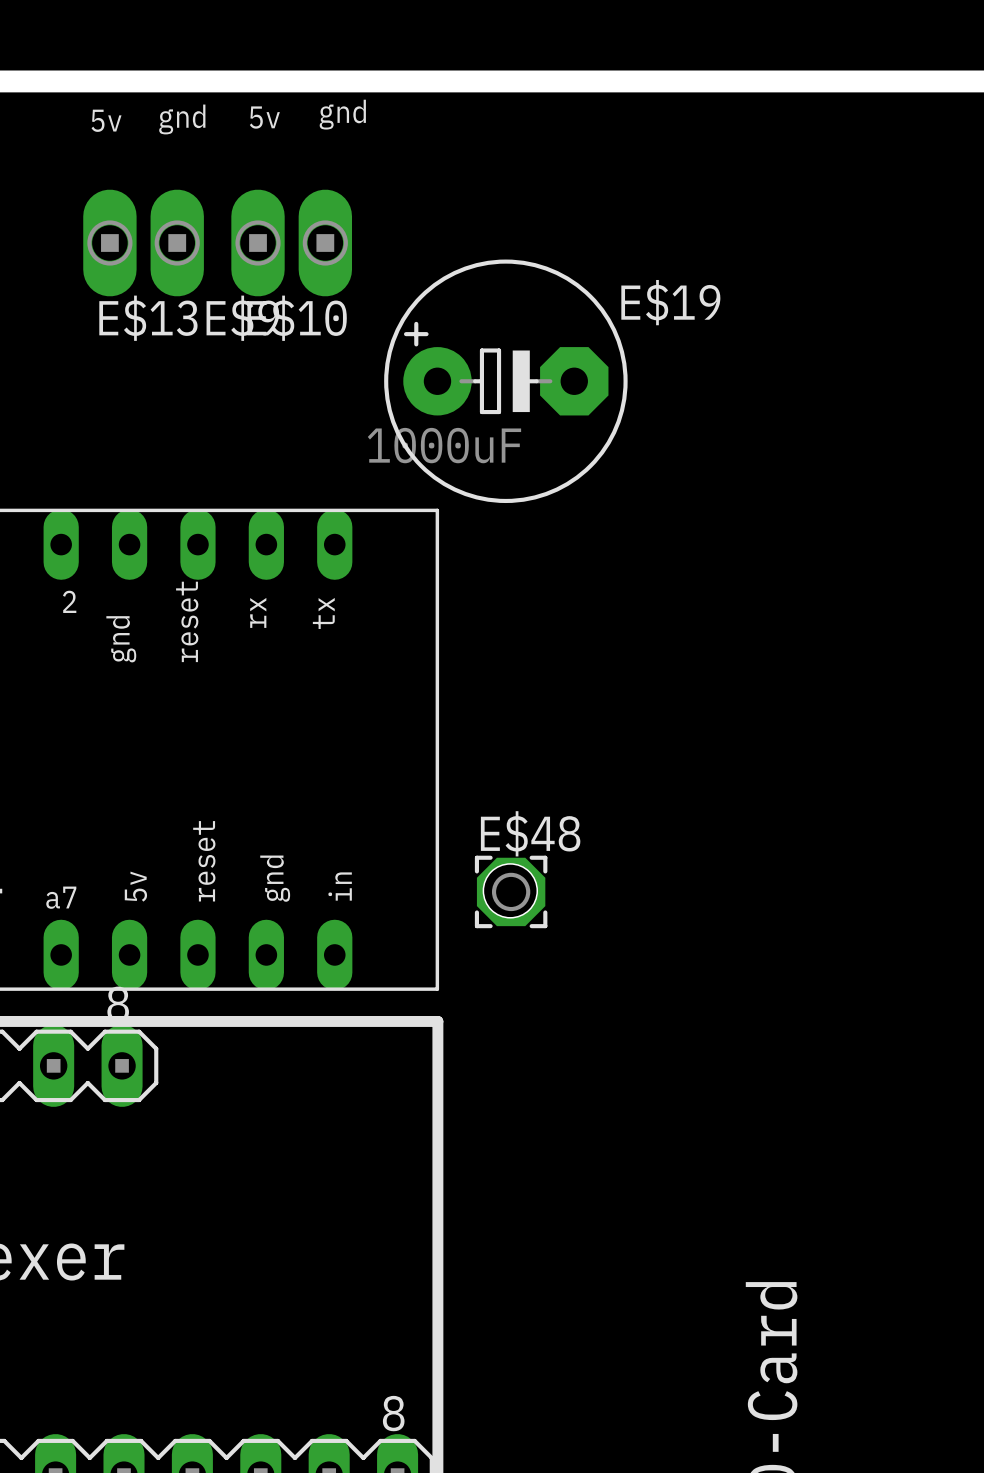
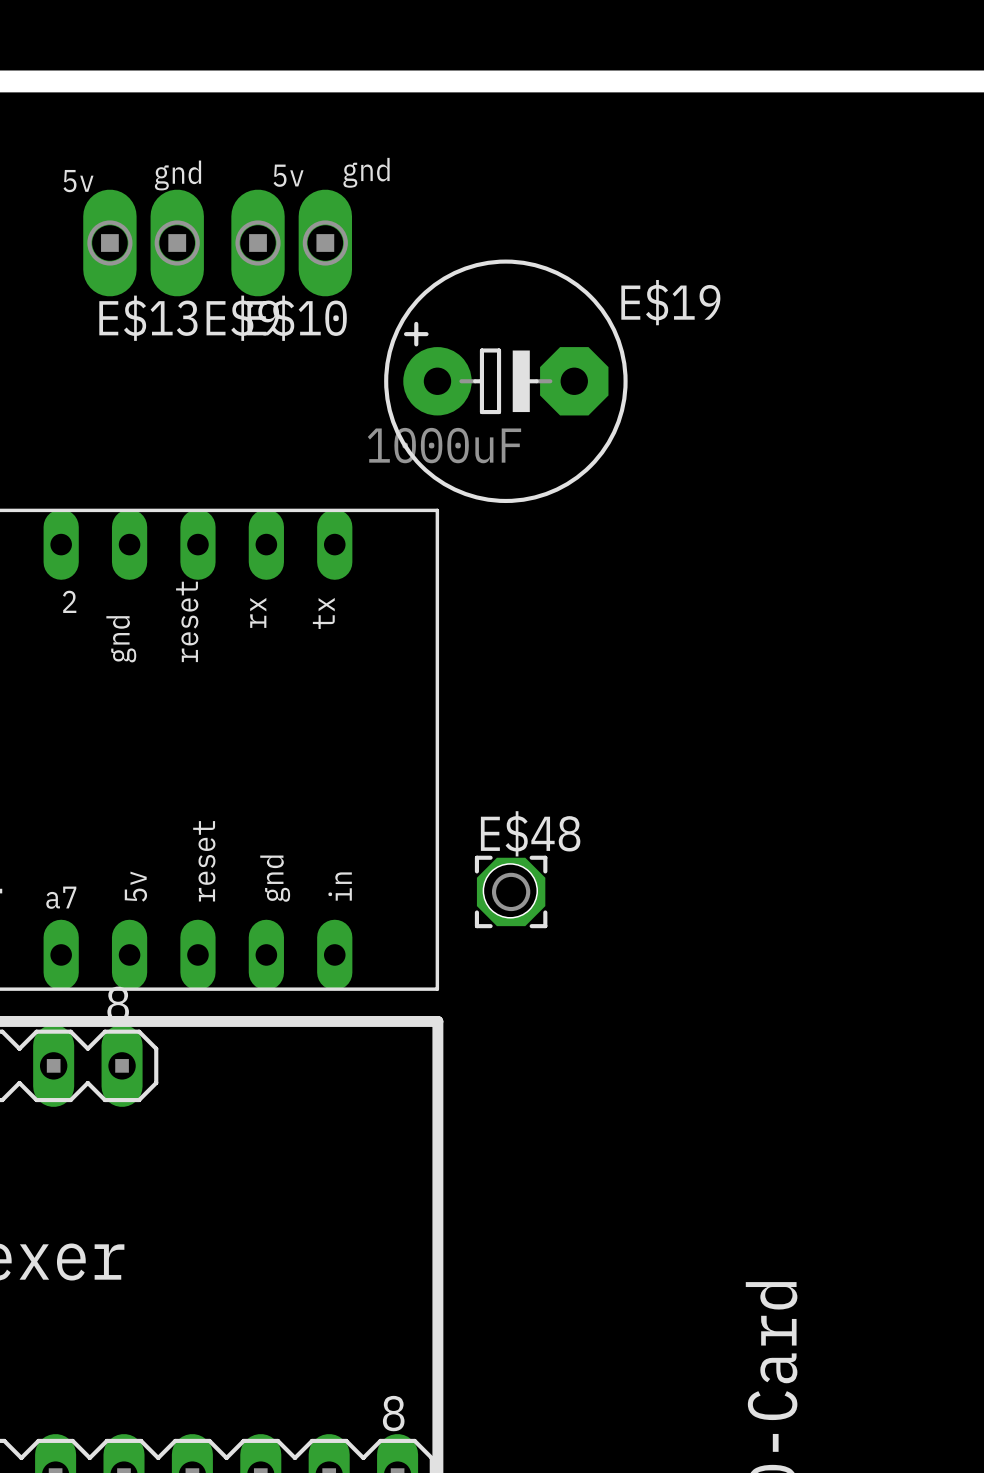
text position: gnd (342, 114) -> gnd (366, 172)
text position: 5v (264, 117) -> 5v (288, 175)
text position: gnd (182, 119) -> gnd (178, 175)
text position: 5v (106, 120) -> 5v (78, 181)

